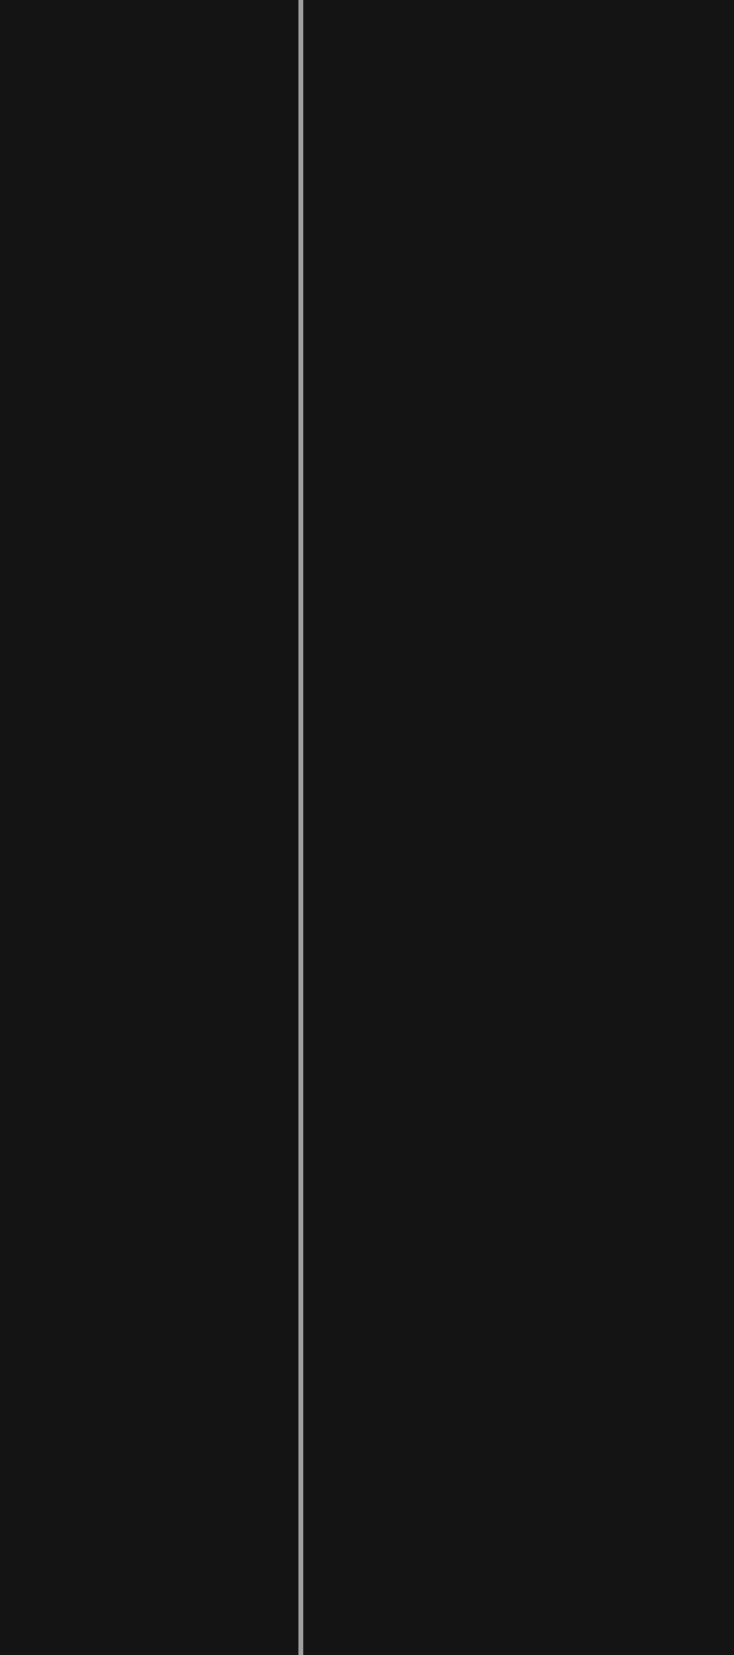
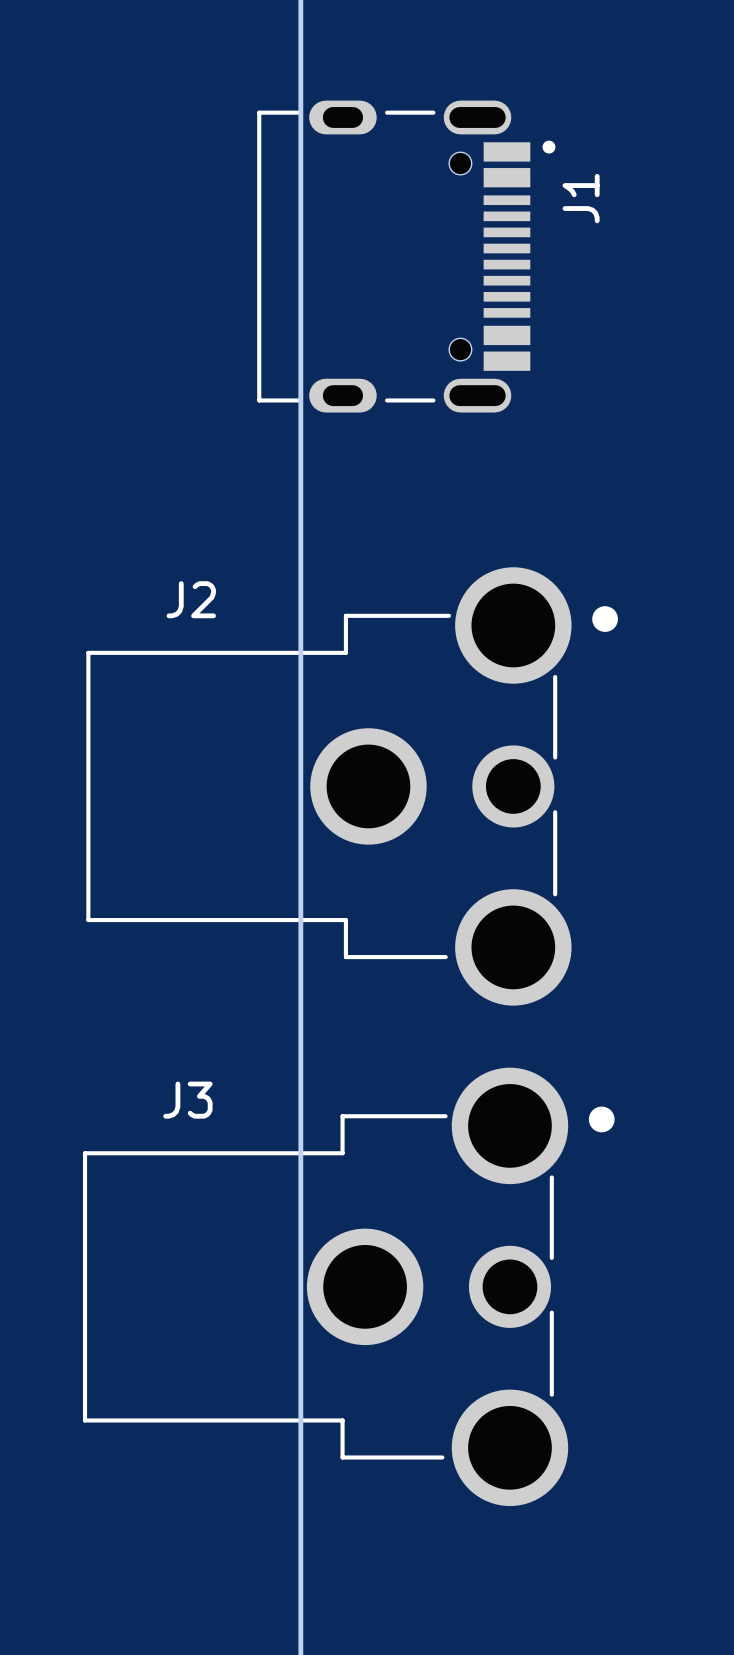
J1: none -> (406, 256)
J2: none -> (352, 786)
J3: none -> (348, 1286)

